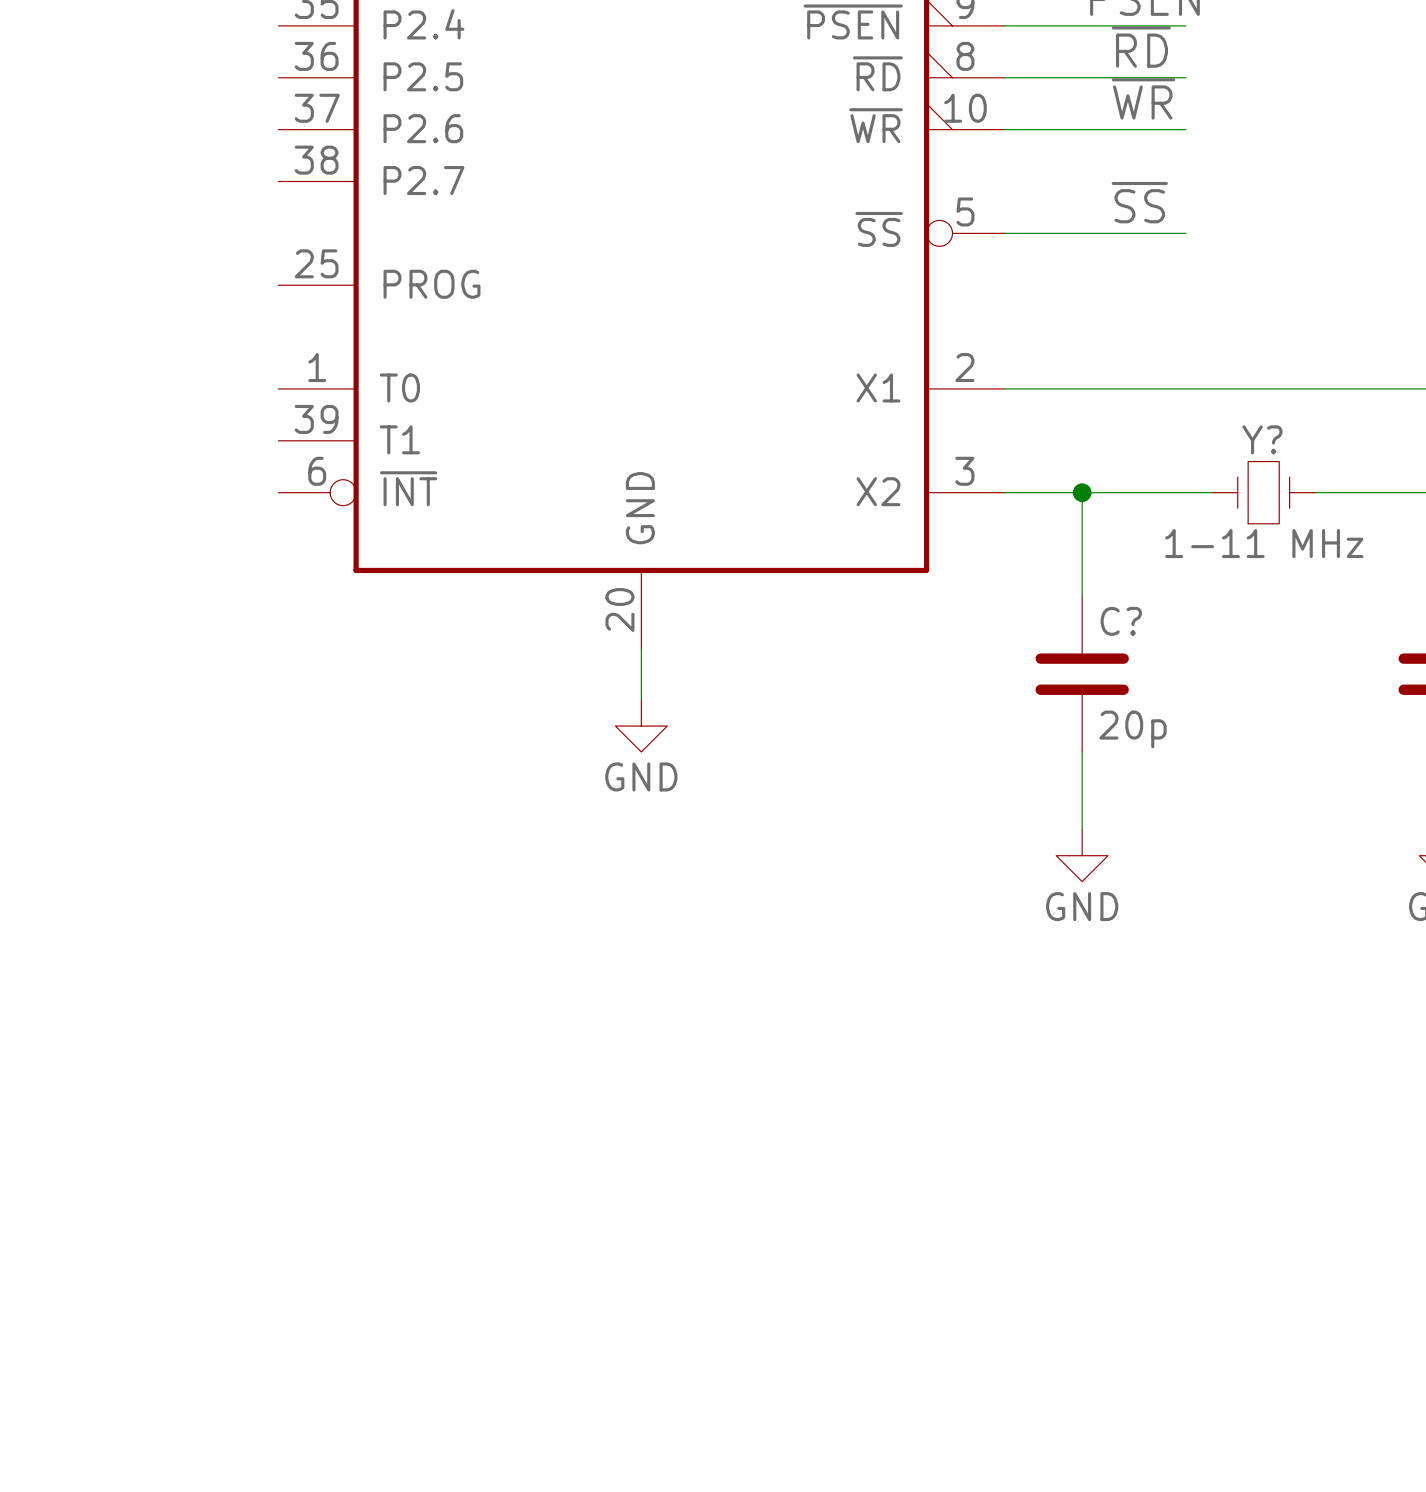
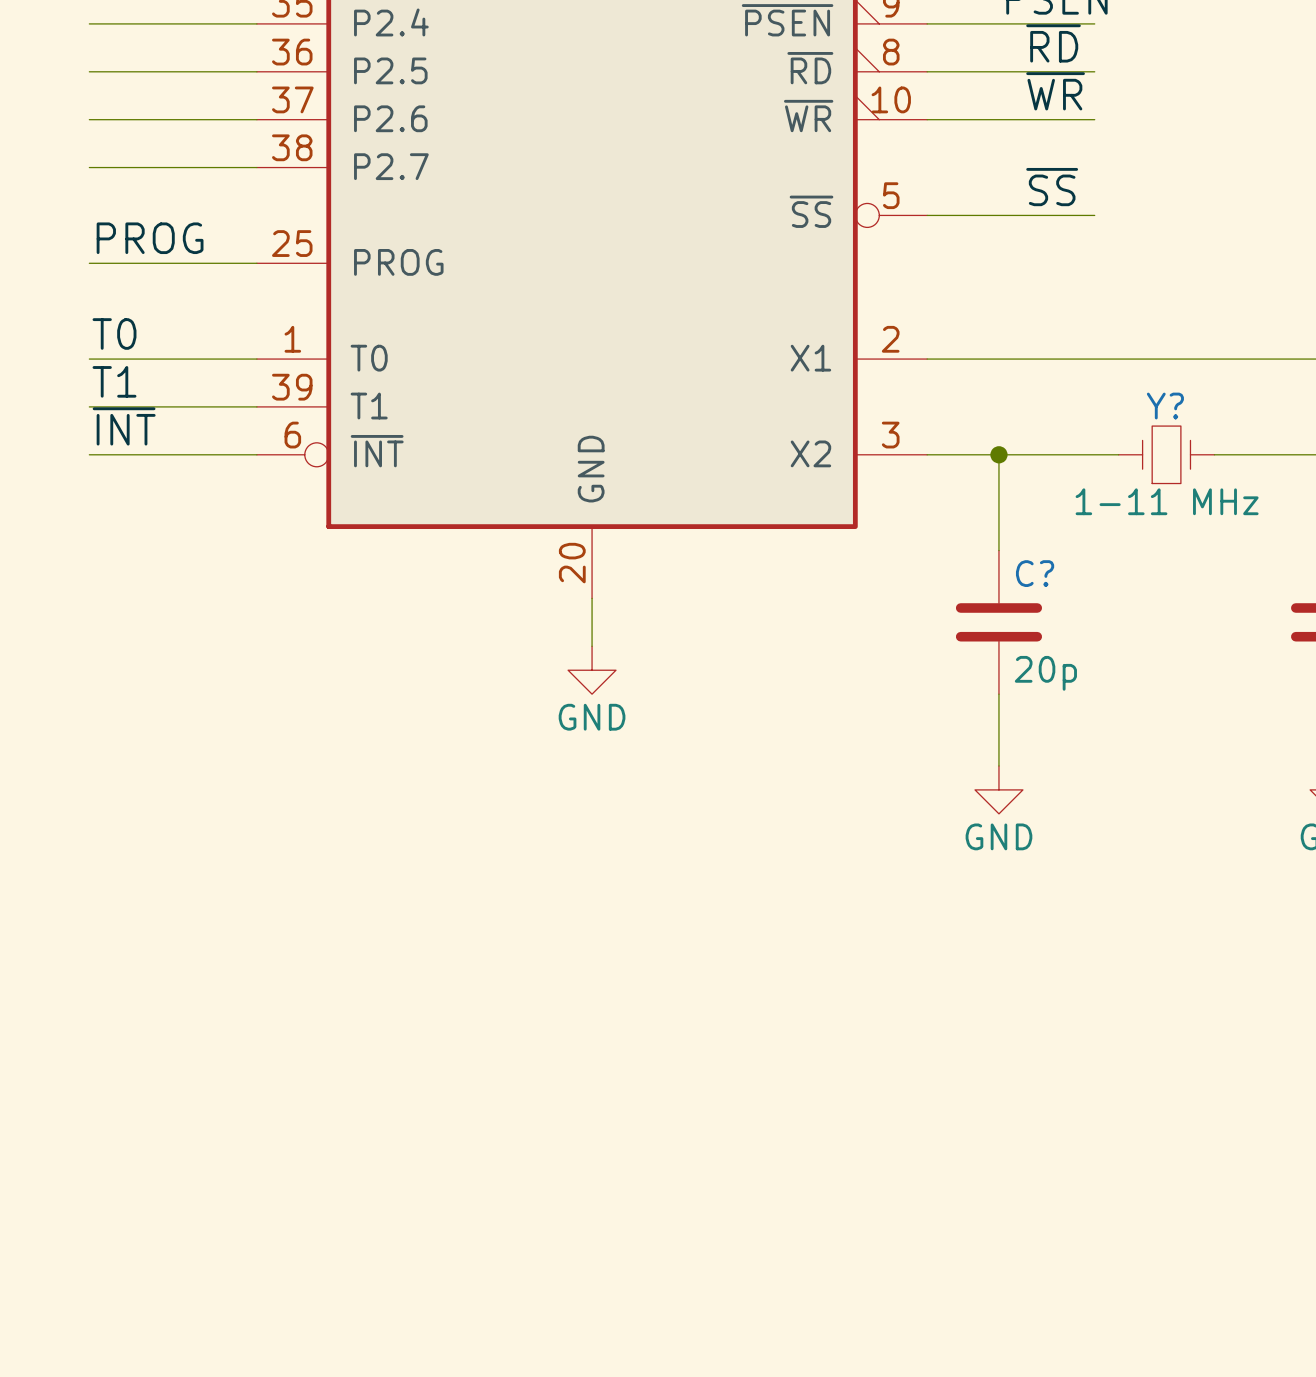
wire: none -> (89, 23) (256, 23)
wire: none -> (89, 71) (256, 71)
wire: none -> (89, 119) (256, 119)
wire: none -> (89, 167) (256, 167)
label: none -> PROG (150, 238)
wire: none -> (89, 263) (256, 263)
label: none -> T0 (114, 333)
wire: none -> (89, 359) (256, 359)
label: none -> T1 (114, 381)
wire: none -> (89, 406) (256, 406)
label: none -> ~{INT} (124, 426)
wire: none -> (89, 454) (256, 454)

